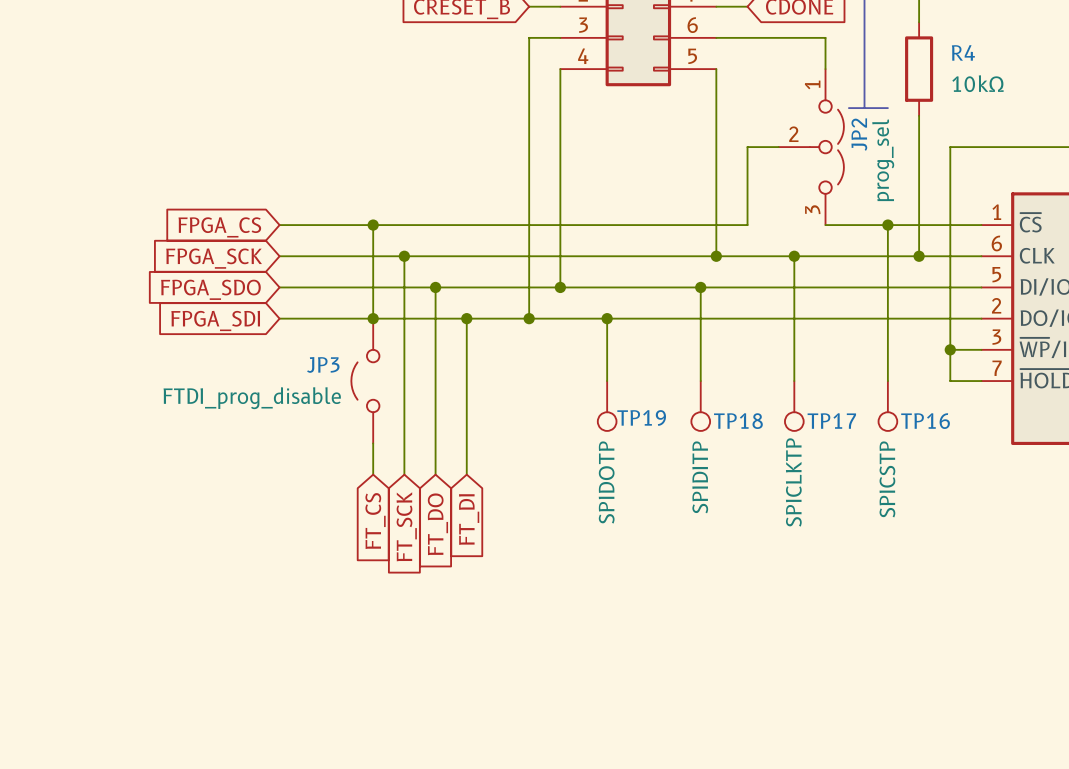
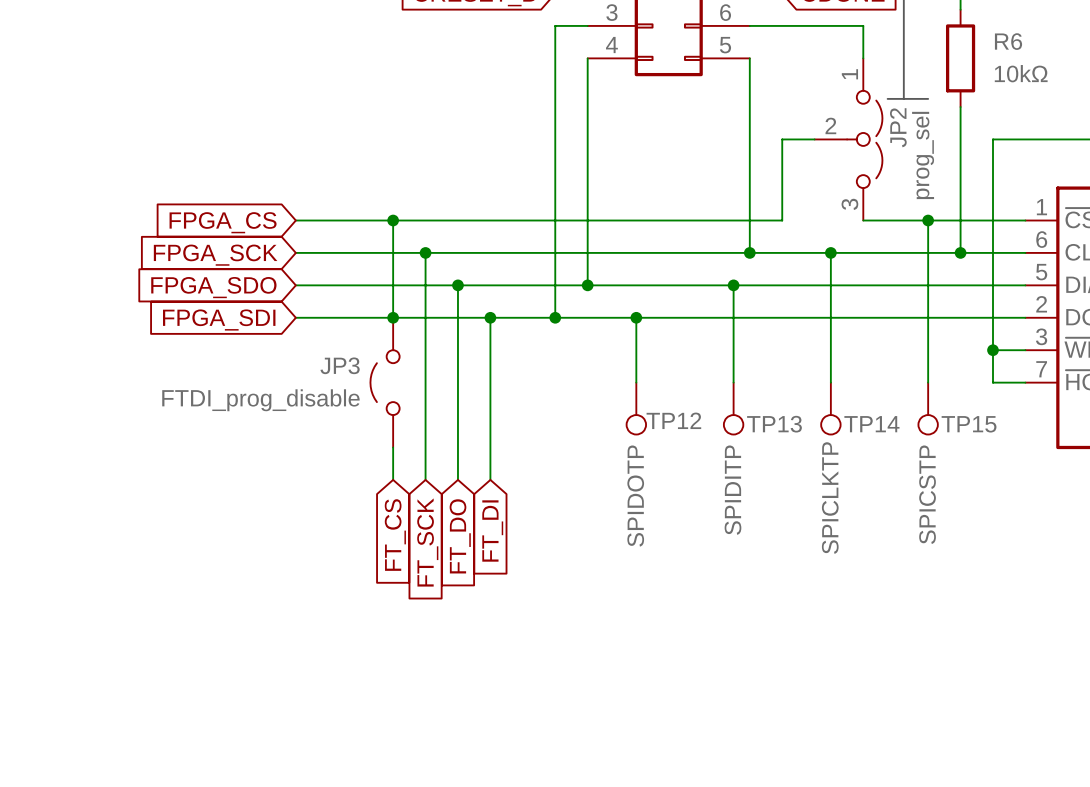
R4 name: R4 (963, 52) -> R6 (1008, 41)
TP19 name: TP19 (641, 417) -> TP12 (673, 420)
TP18 name: TP18 (738, 421) -> TP13 (774, 424)
TP17 name: TP17 (831, 421) -> TP14 (871, 424)
TP16 name: TP16 (925, 421) -> TP15 (969, 424)

